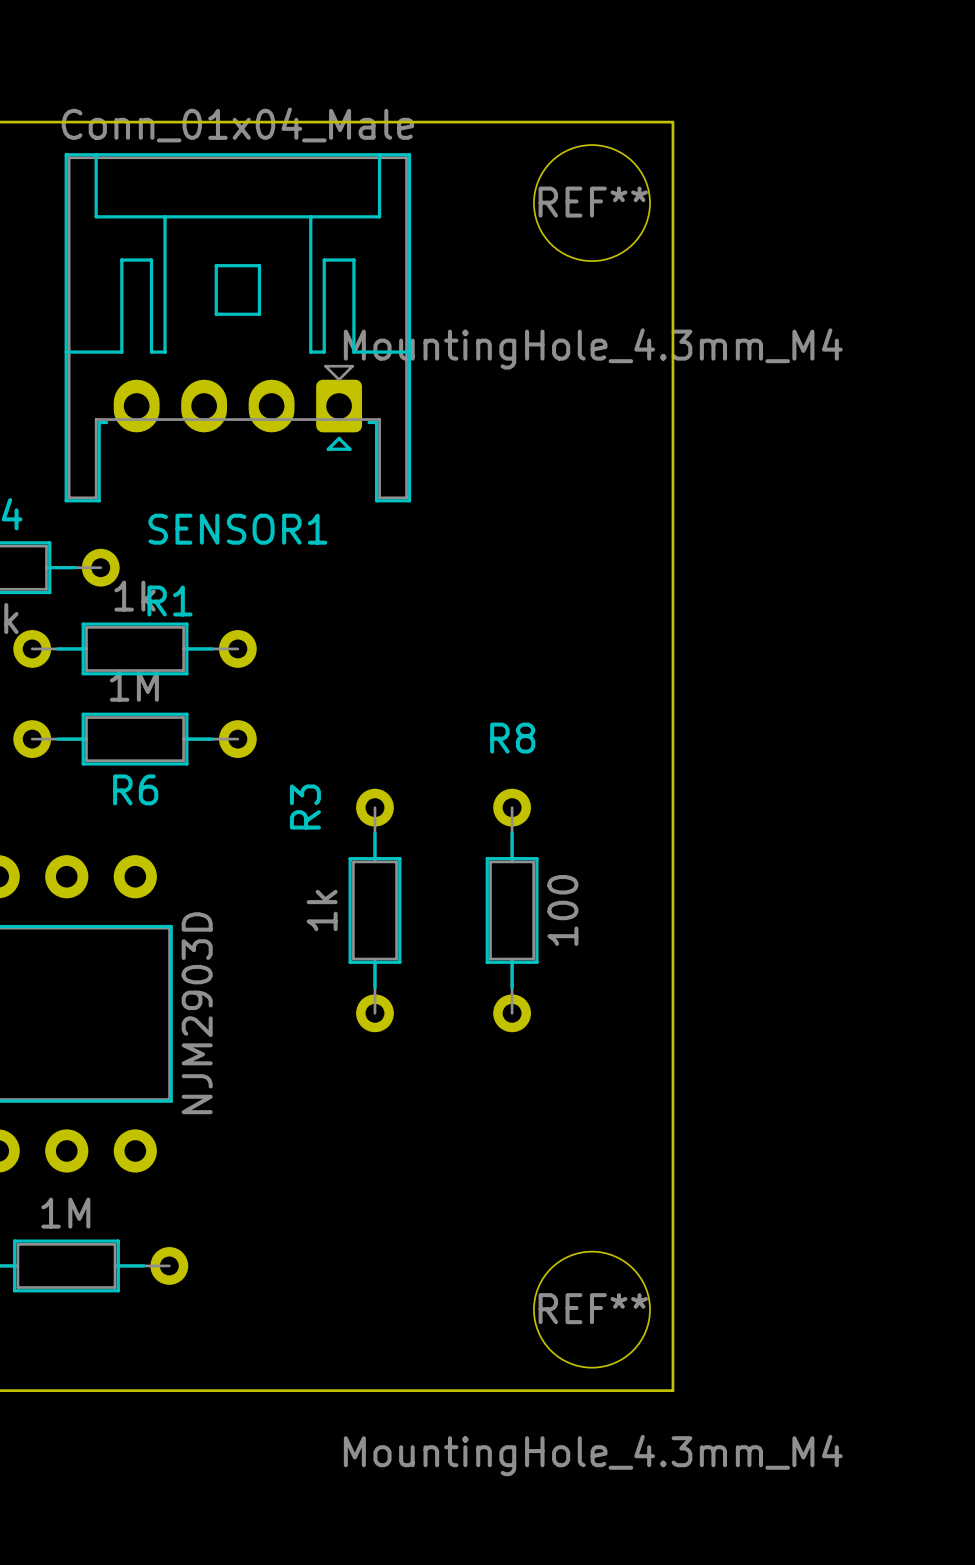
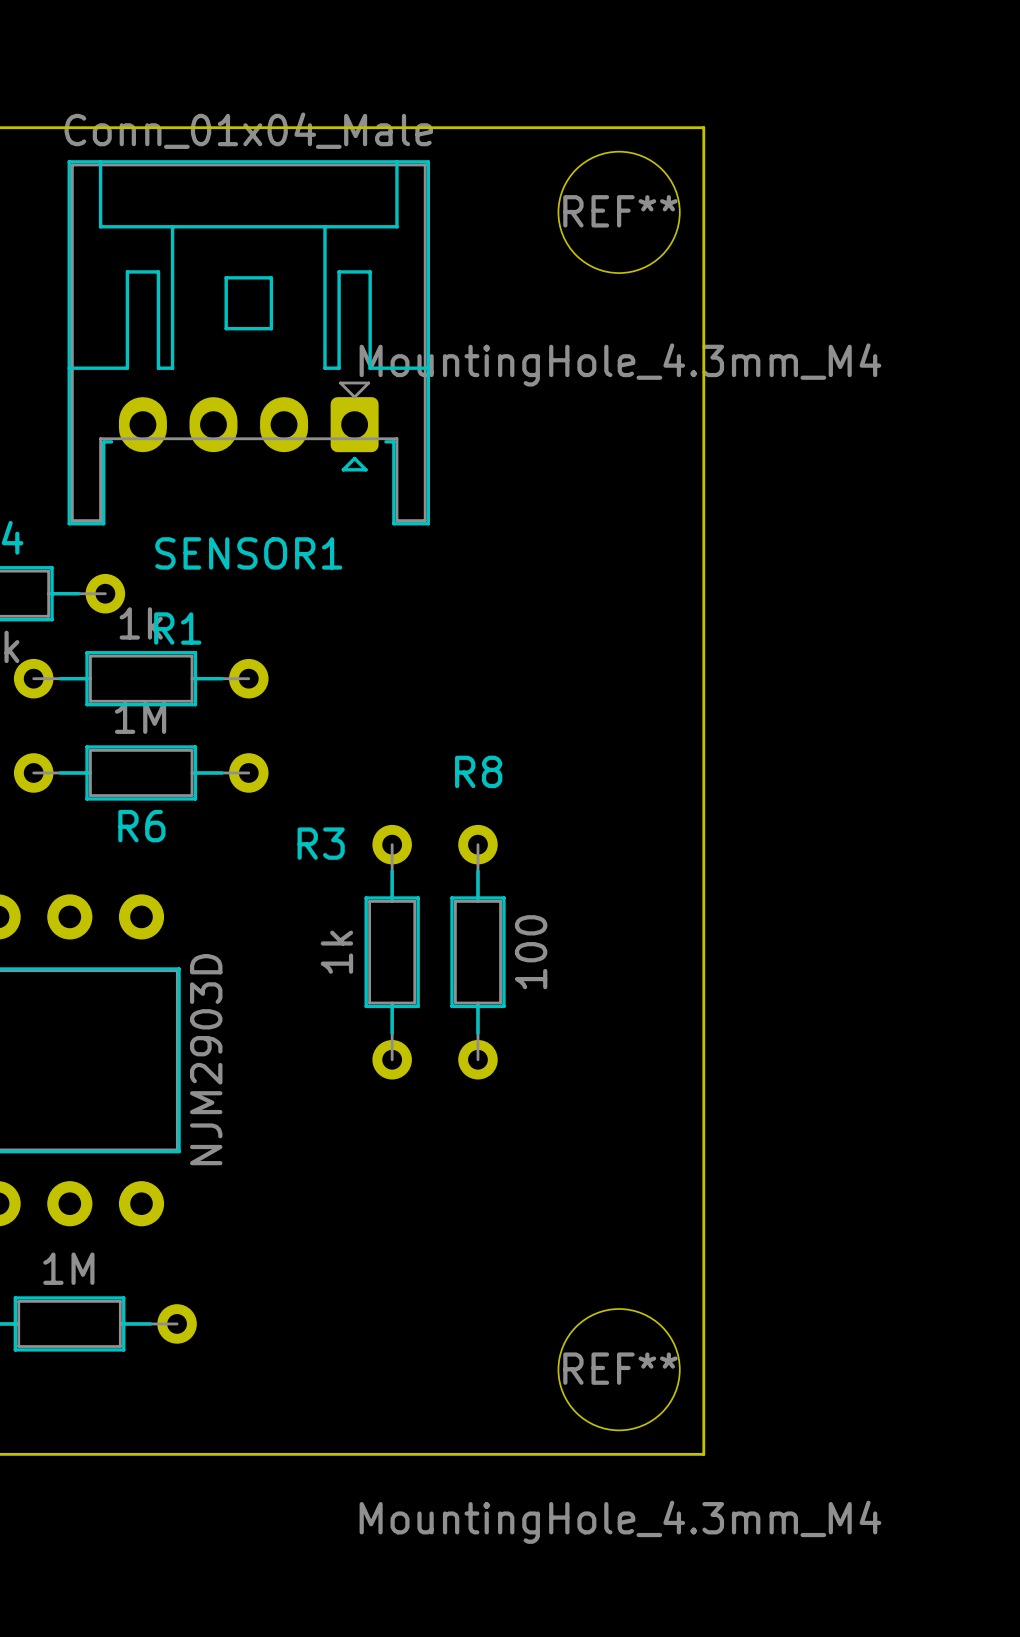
R3 name rotation: 0° (305, 807) -> 90° clockwise (321, 843)
R8 position: (512, 910) -> (477, 952)

